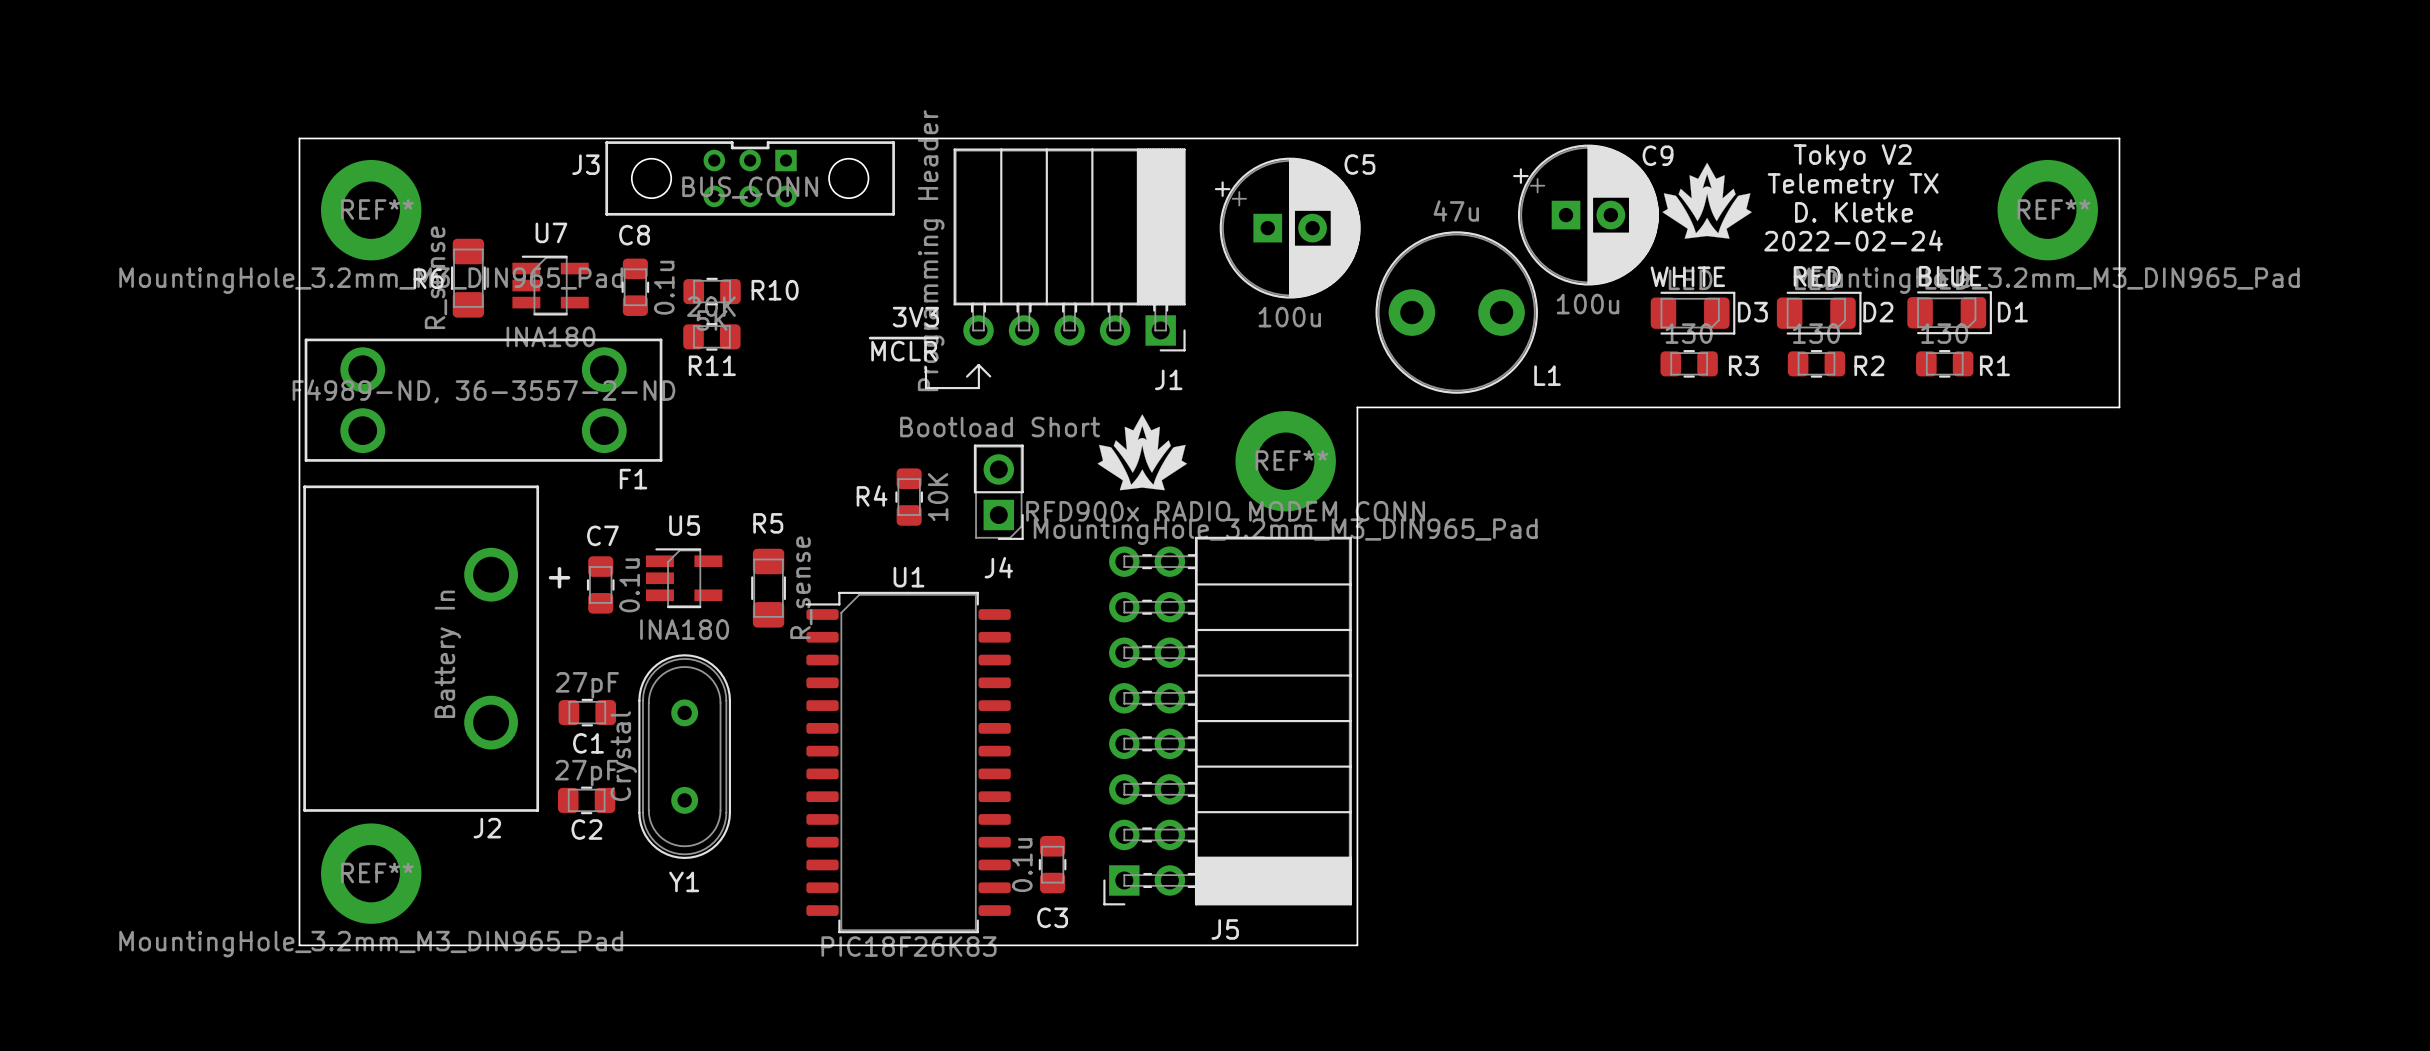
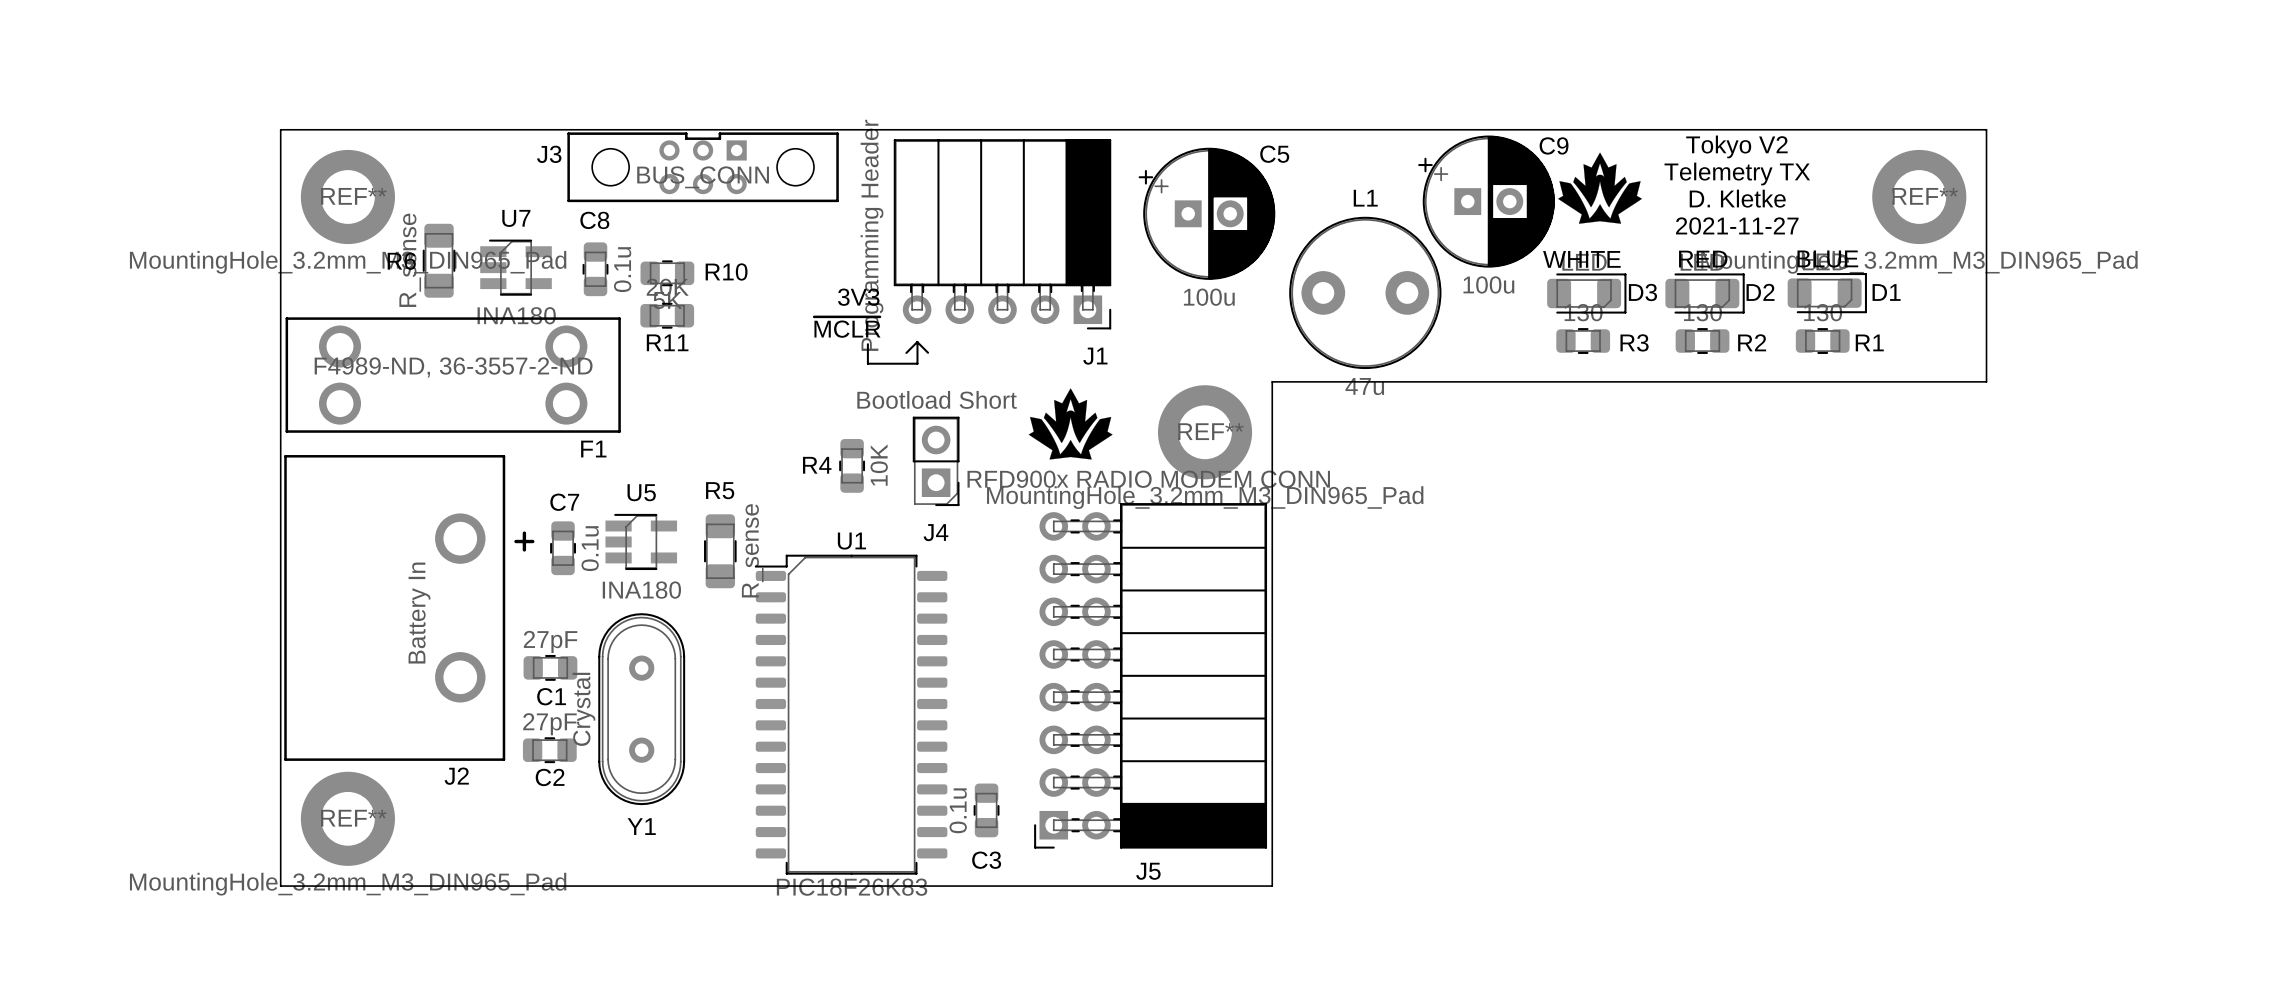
L1 value position: 47u (1456, 211) -> 47u (1364, 386)
text: 2022-02-24 (1853, 240) -> 2021-11-27 (1737, 226)
L1 name position: L1 (1547, 375) -> L1 (1365, 198)

